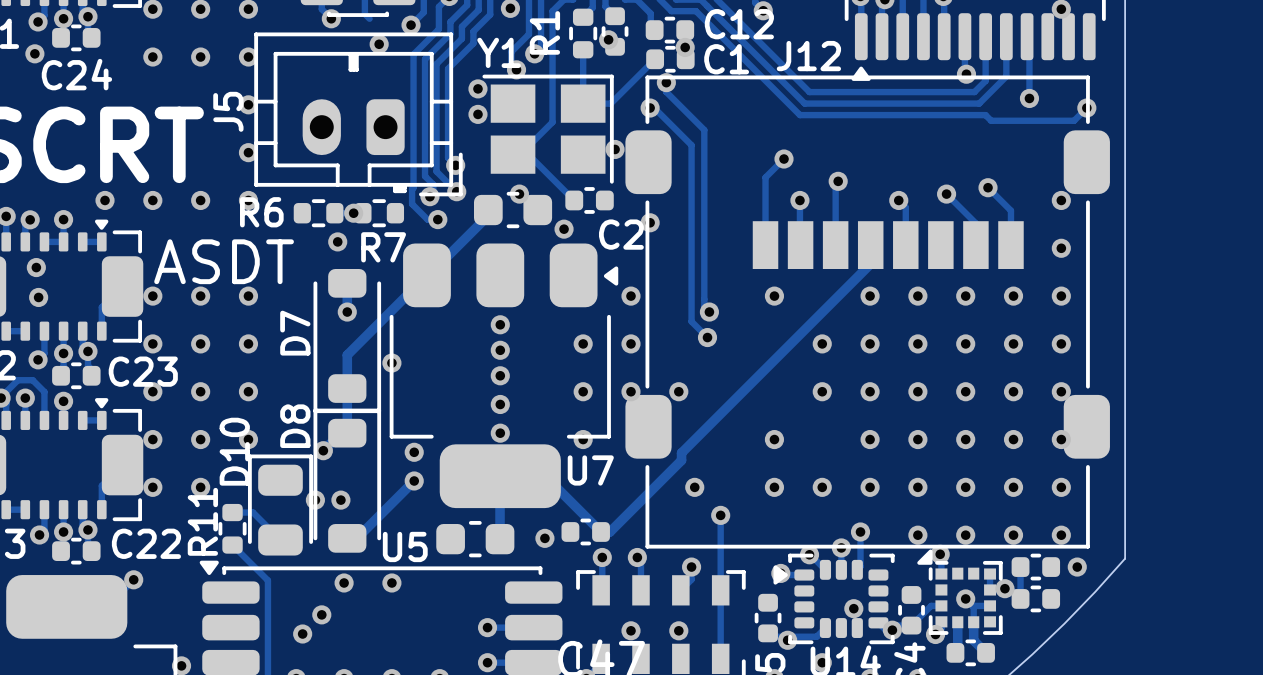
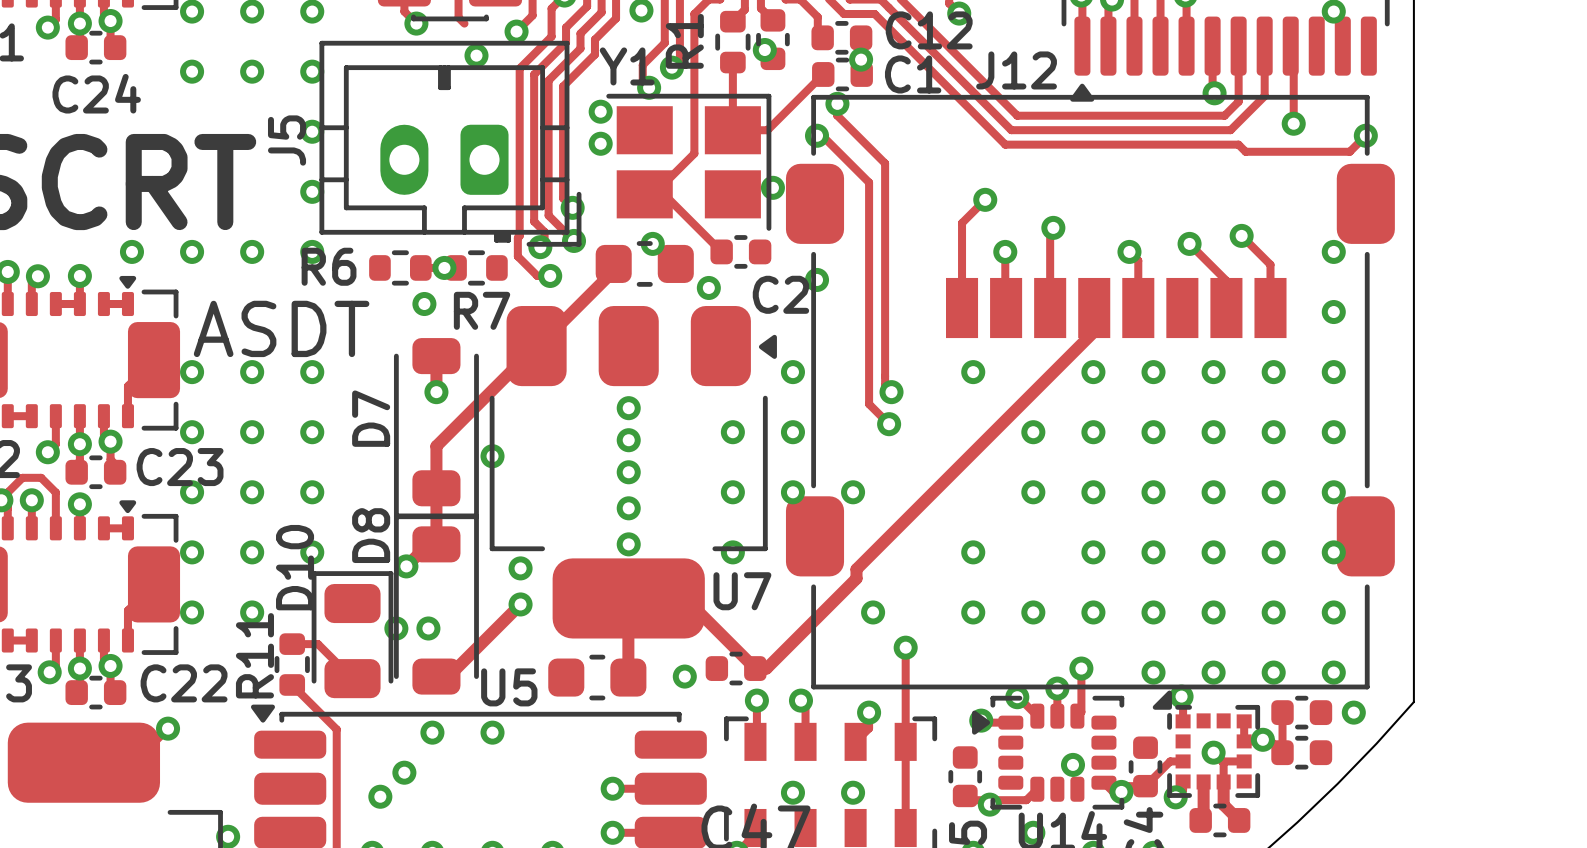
via: (34, 53) -> none
via: (36, 267) -> none
via: (38, 297) -> none

